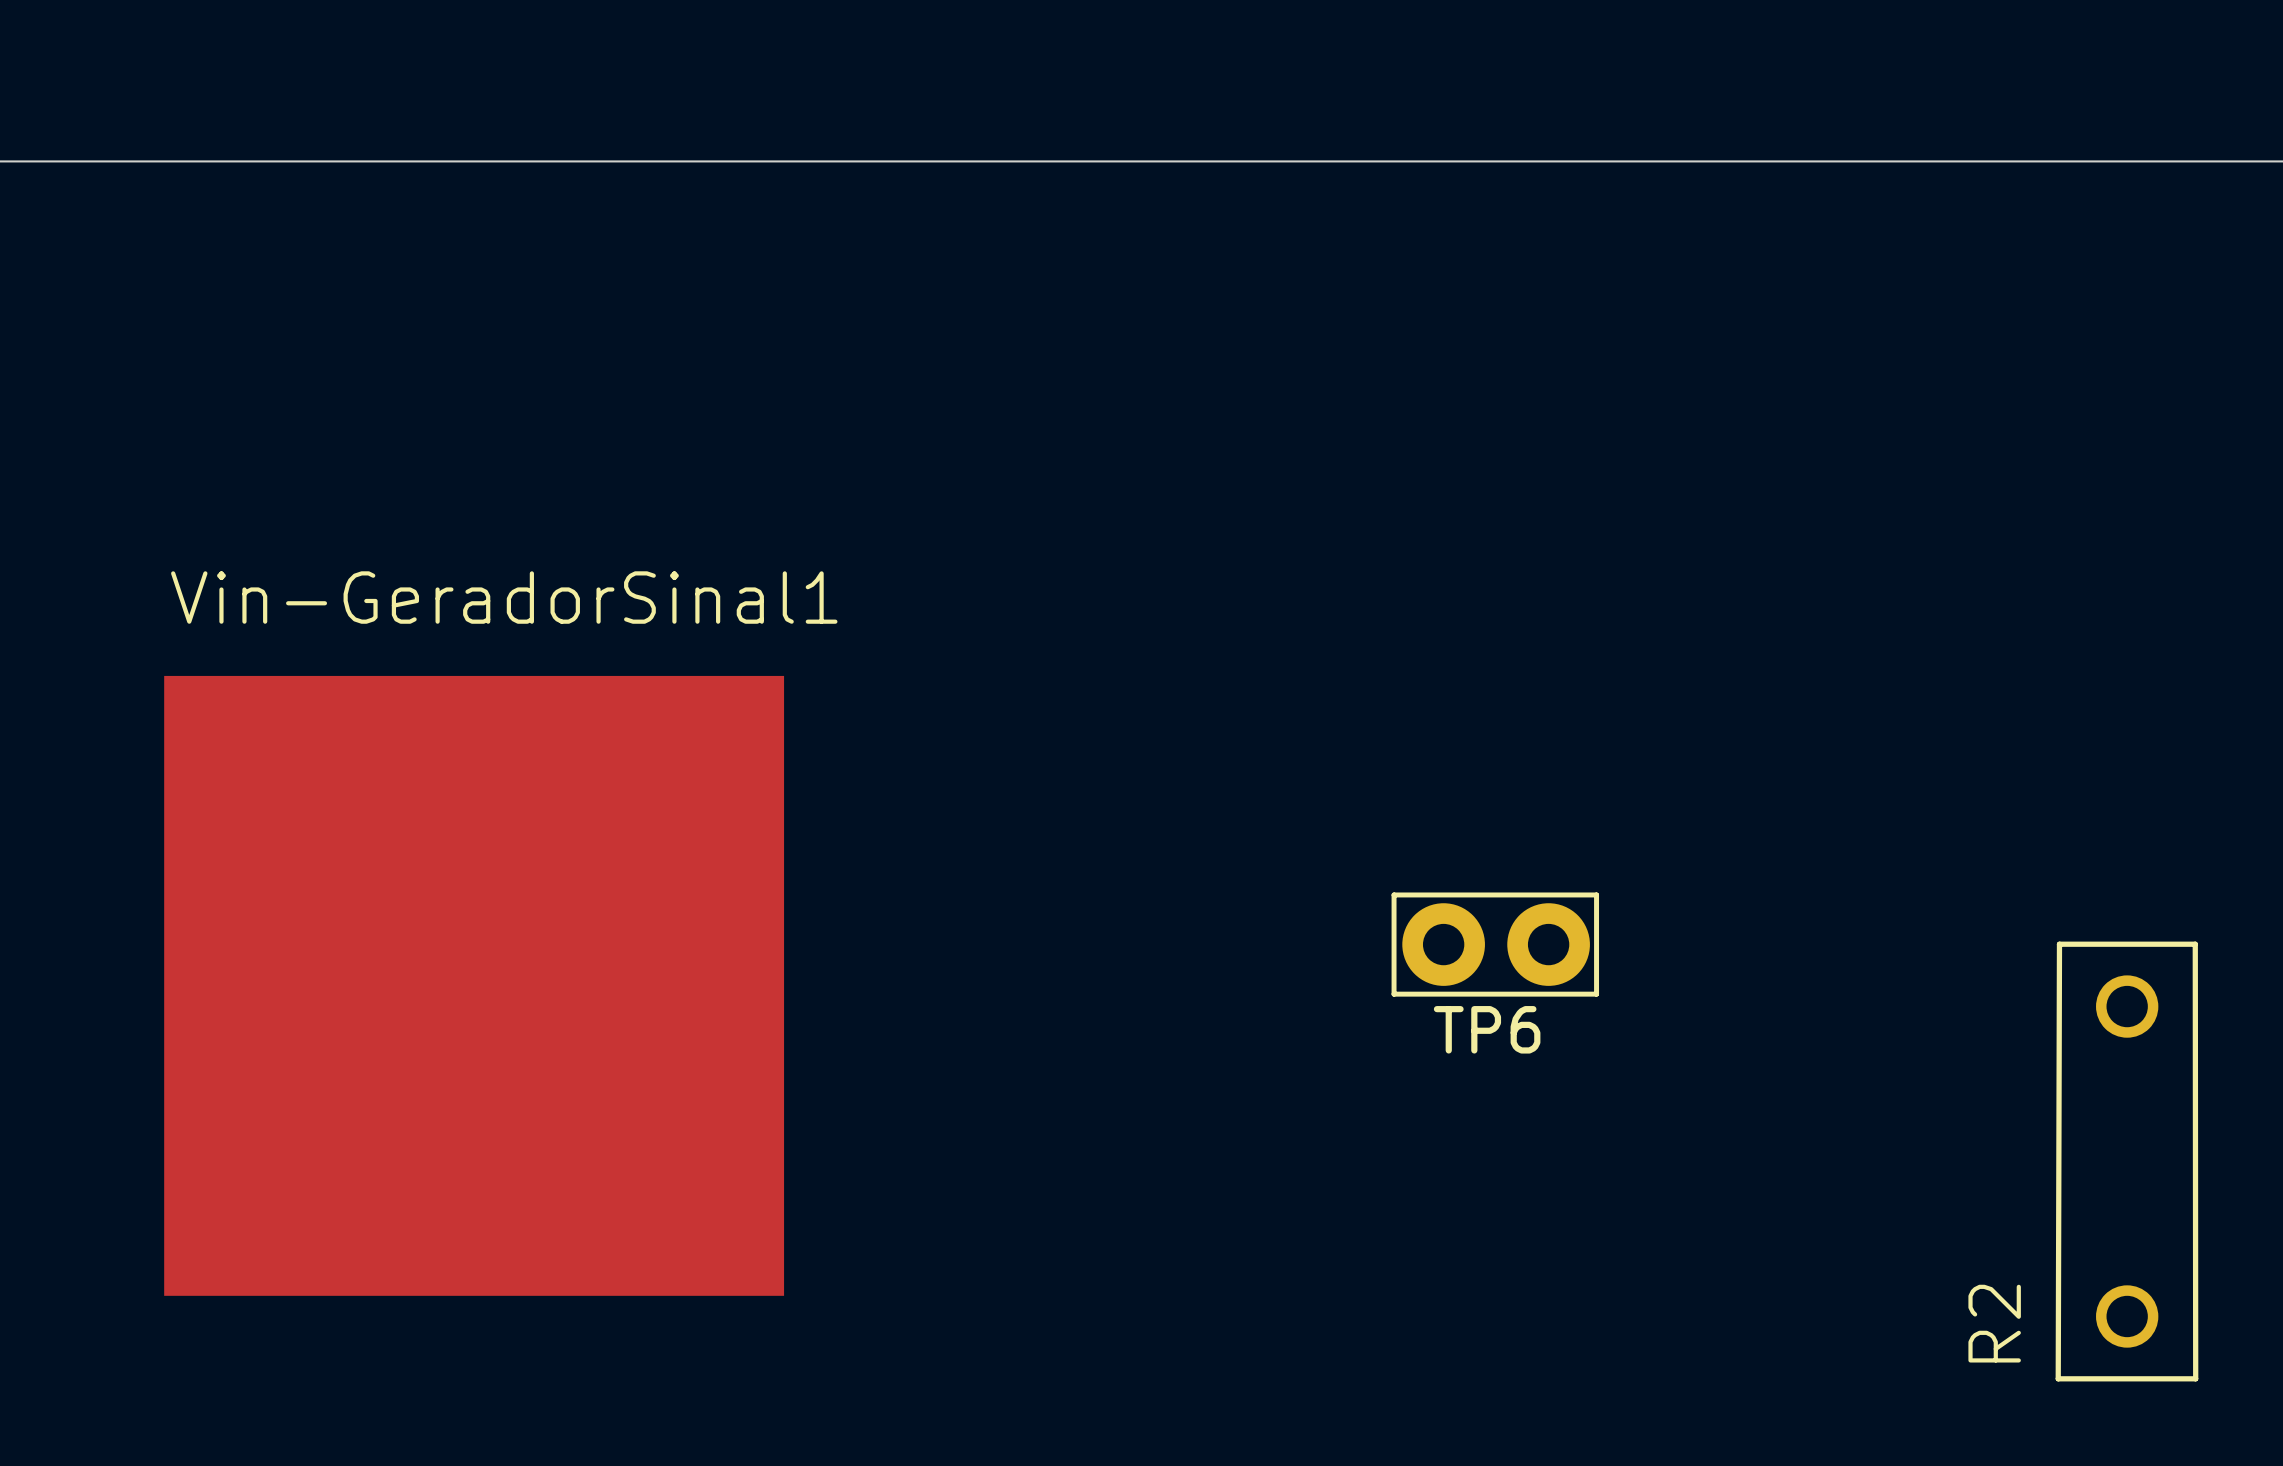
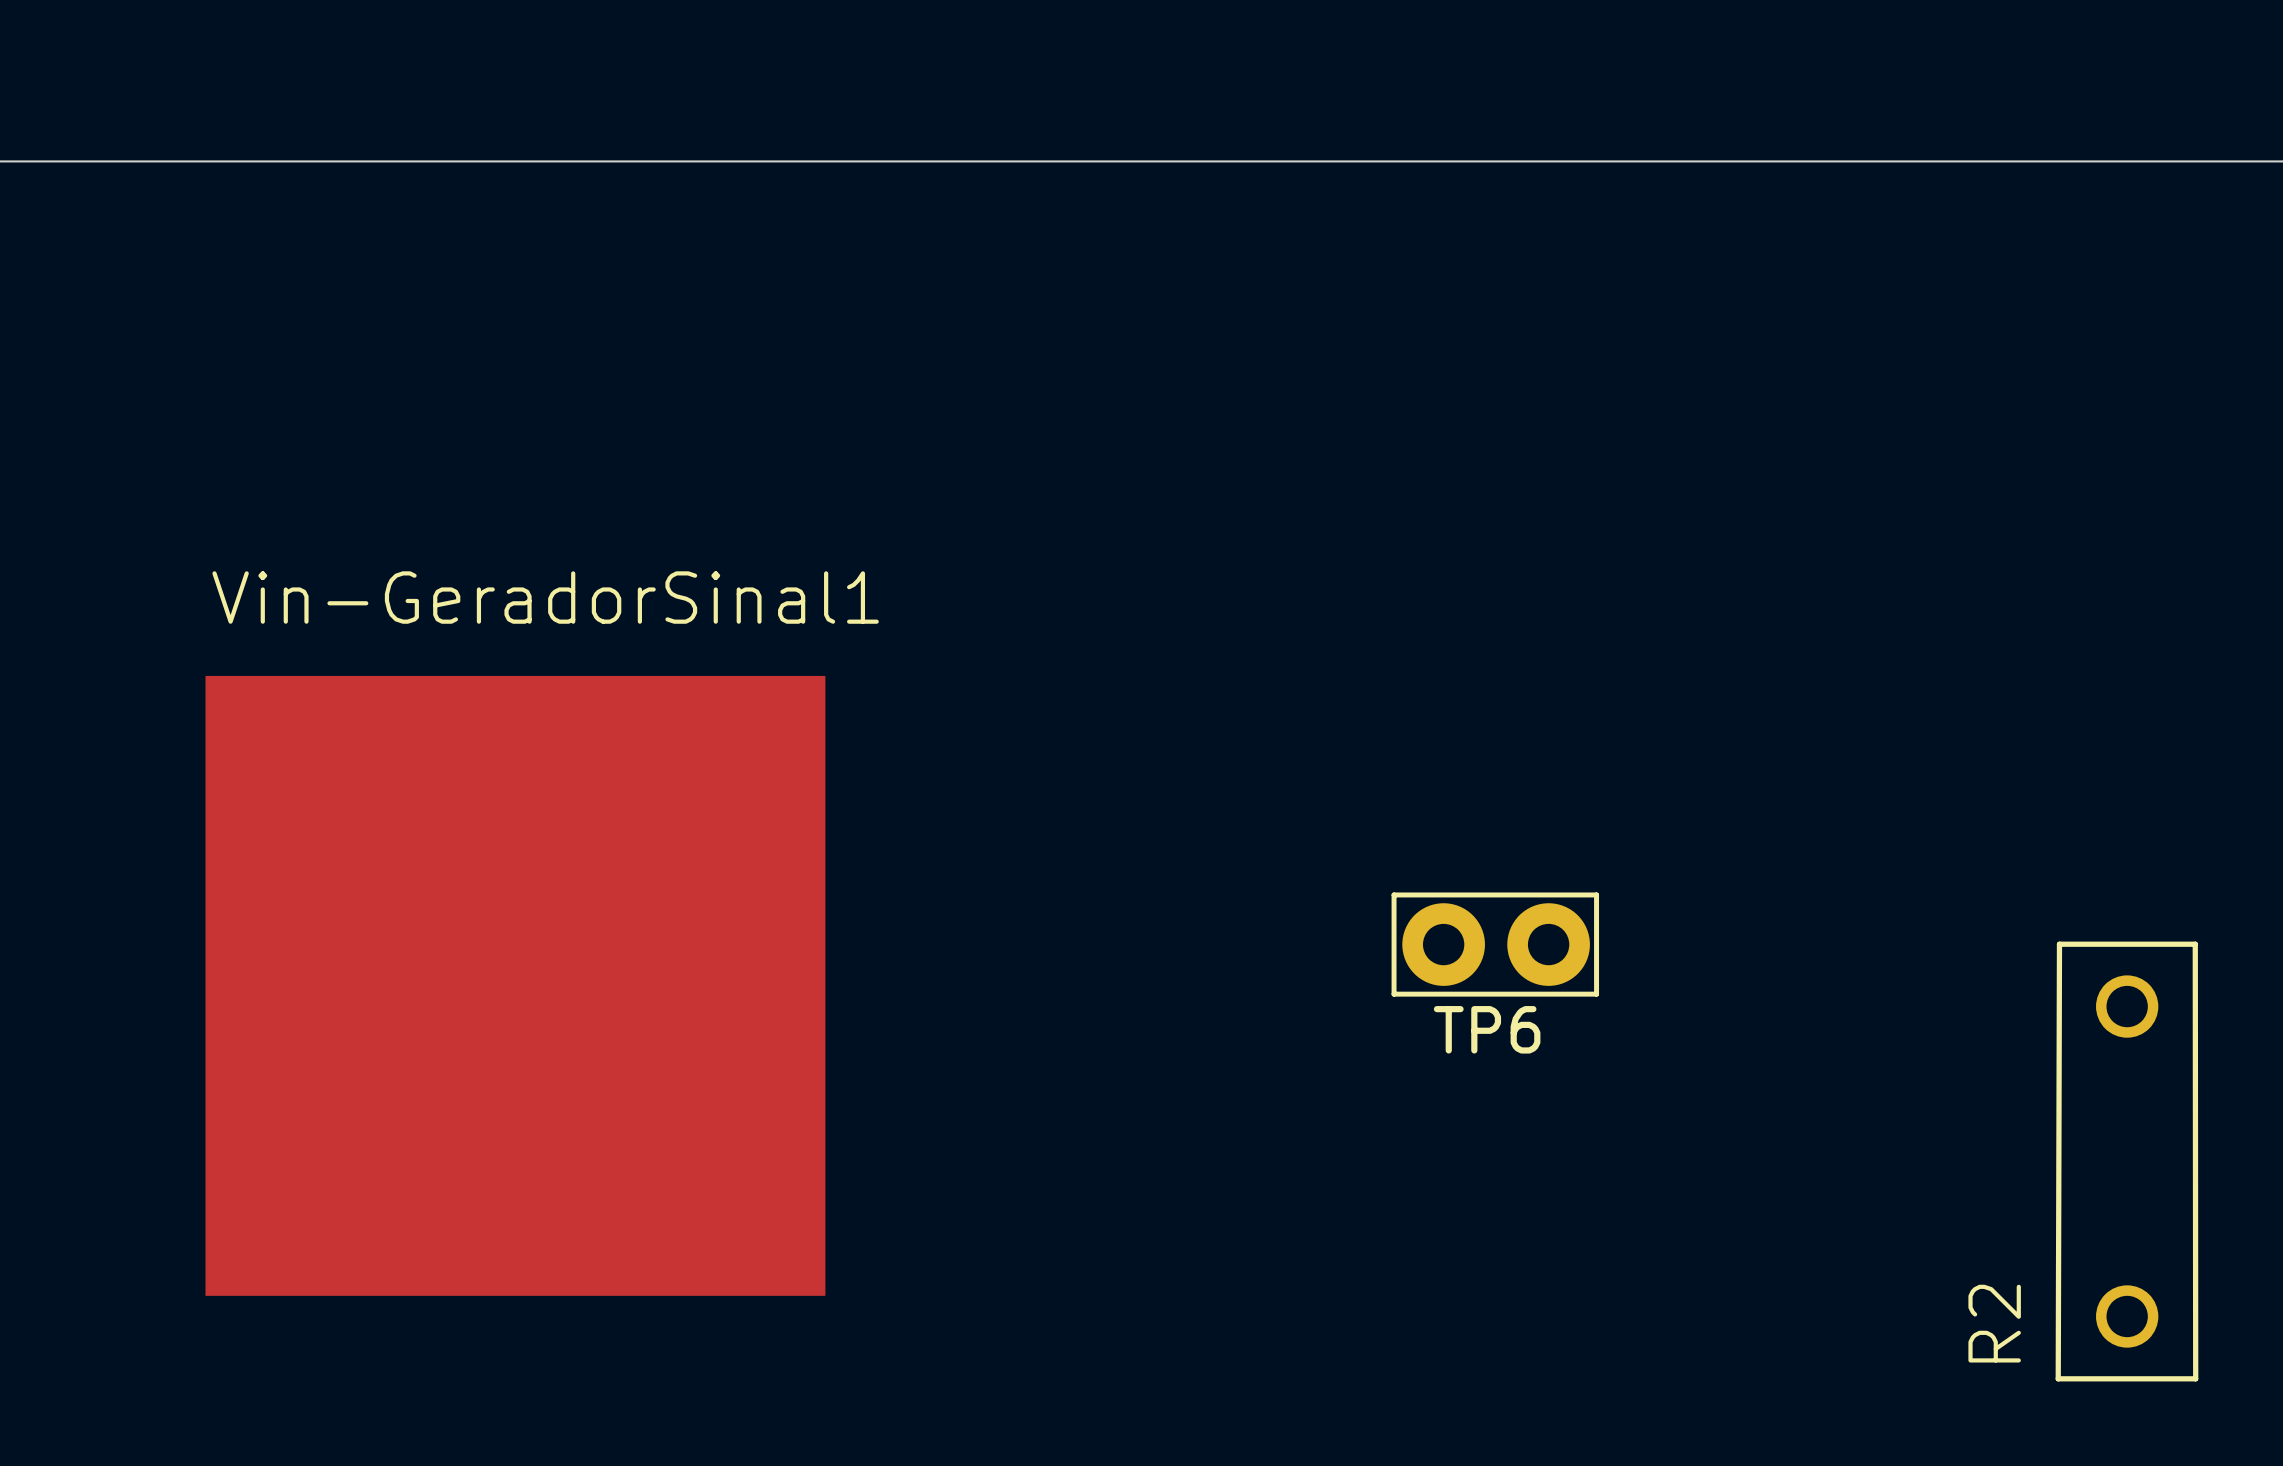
Vin-GeradorSinal1 position: (474, 985) -> (515, 985)

